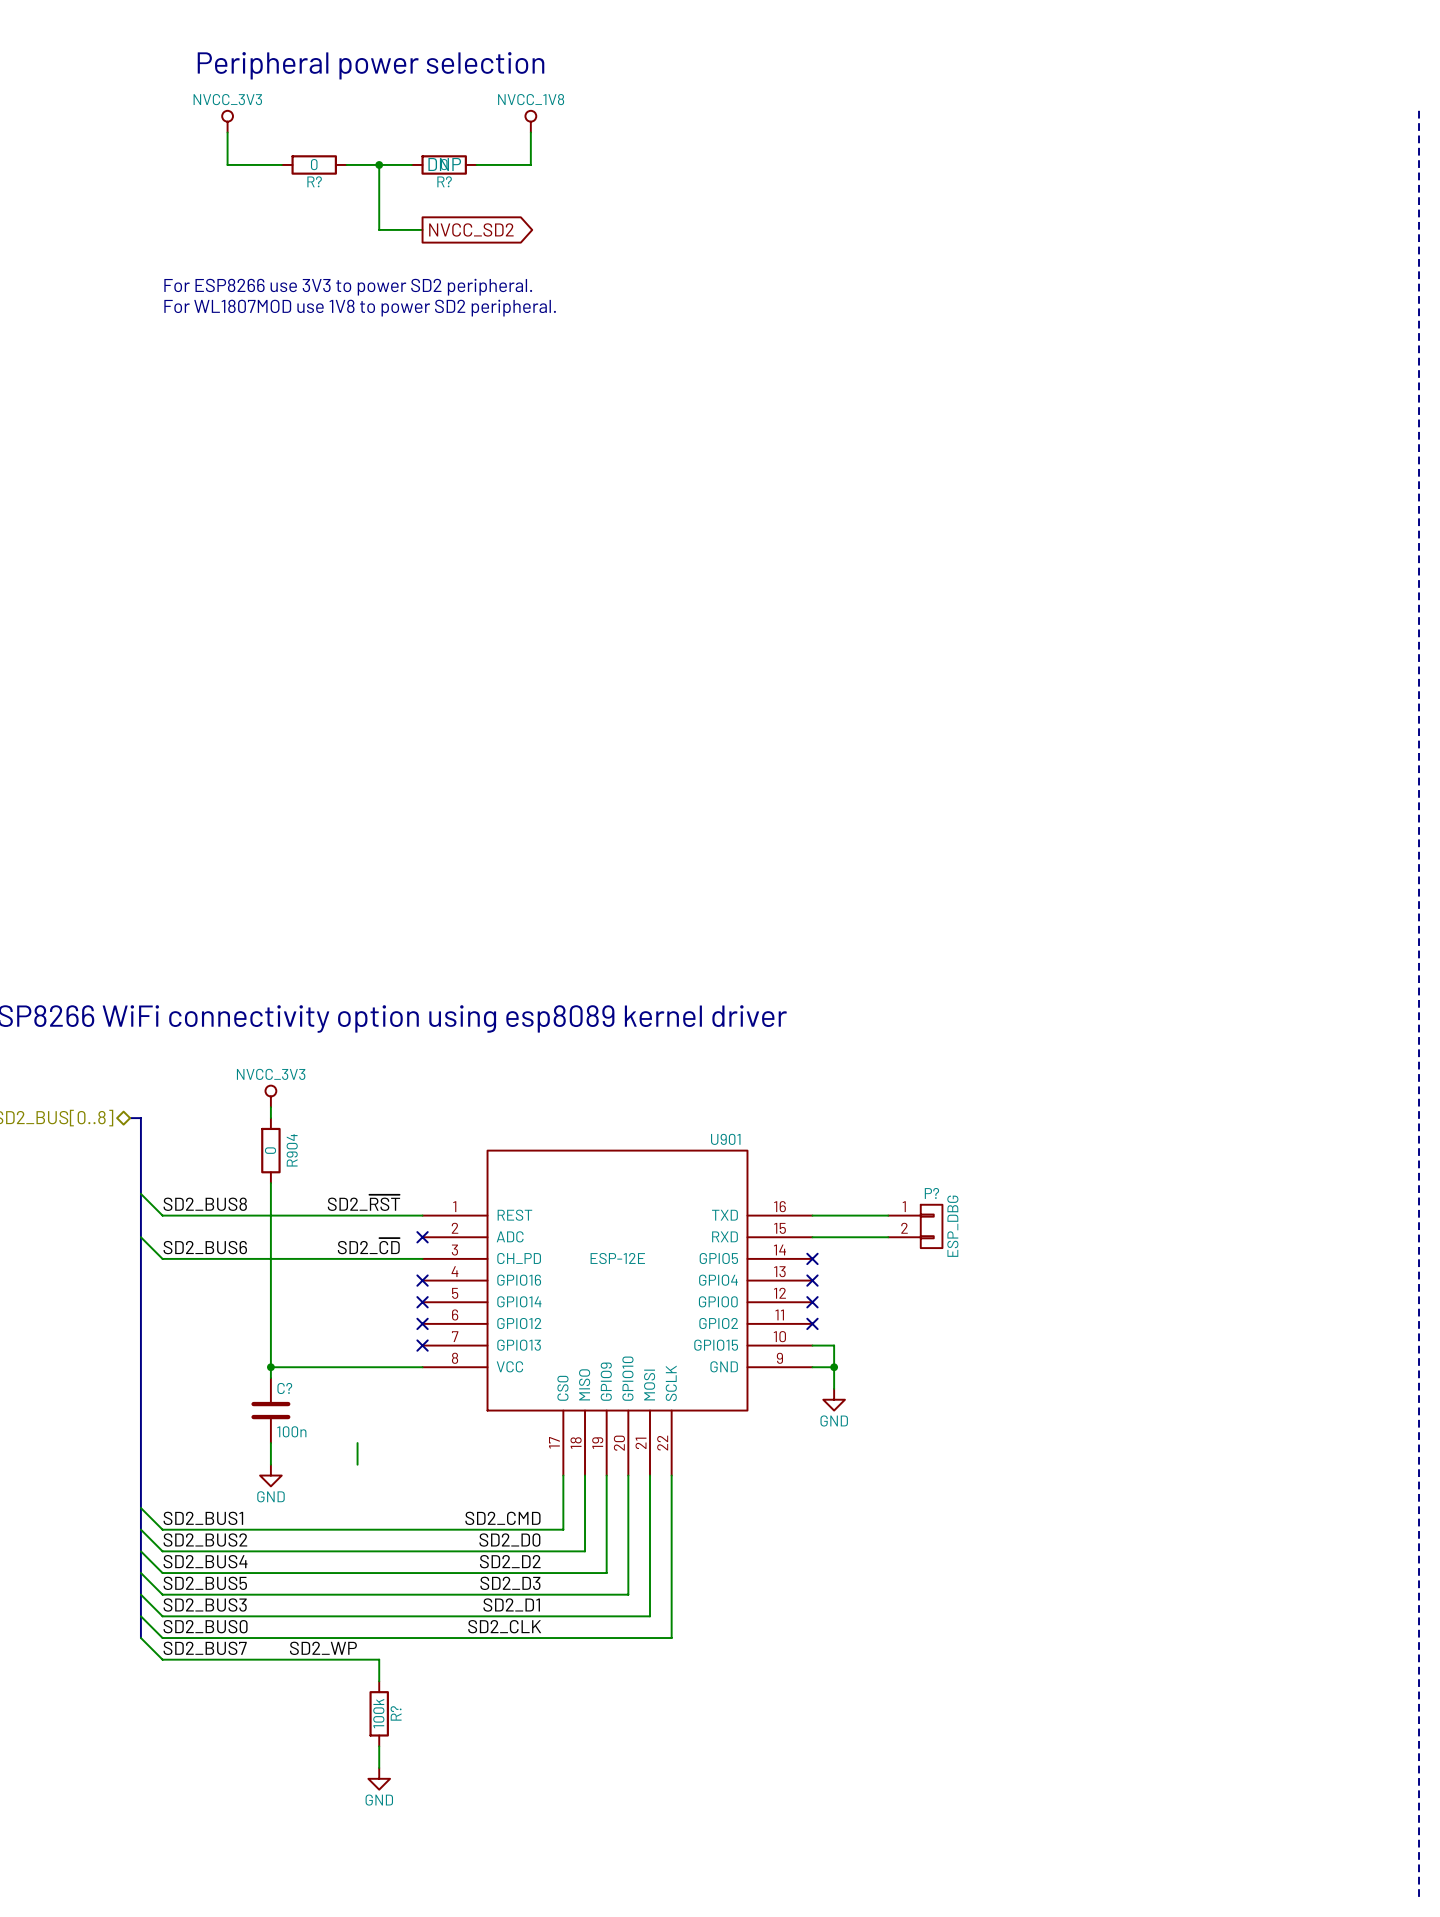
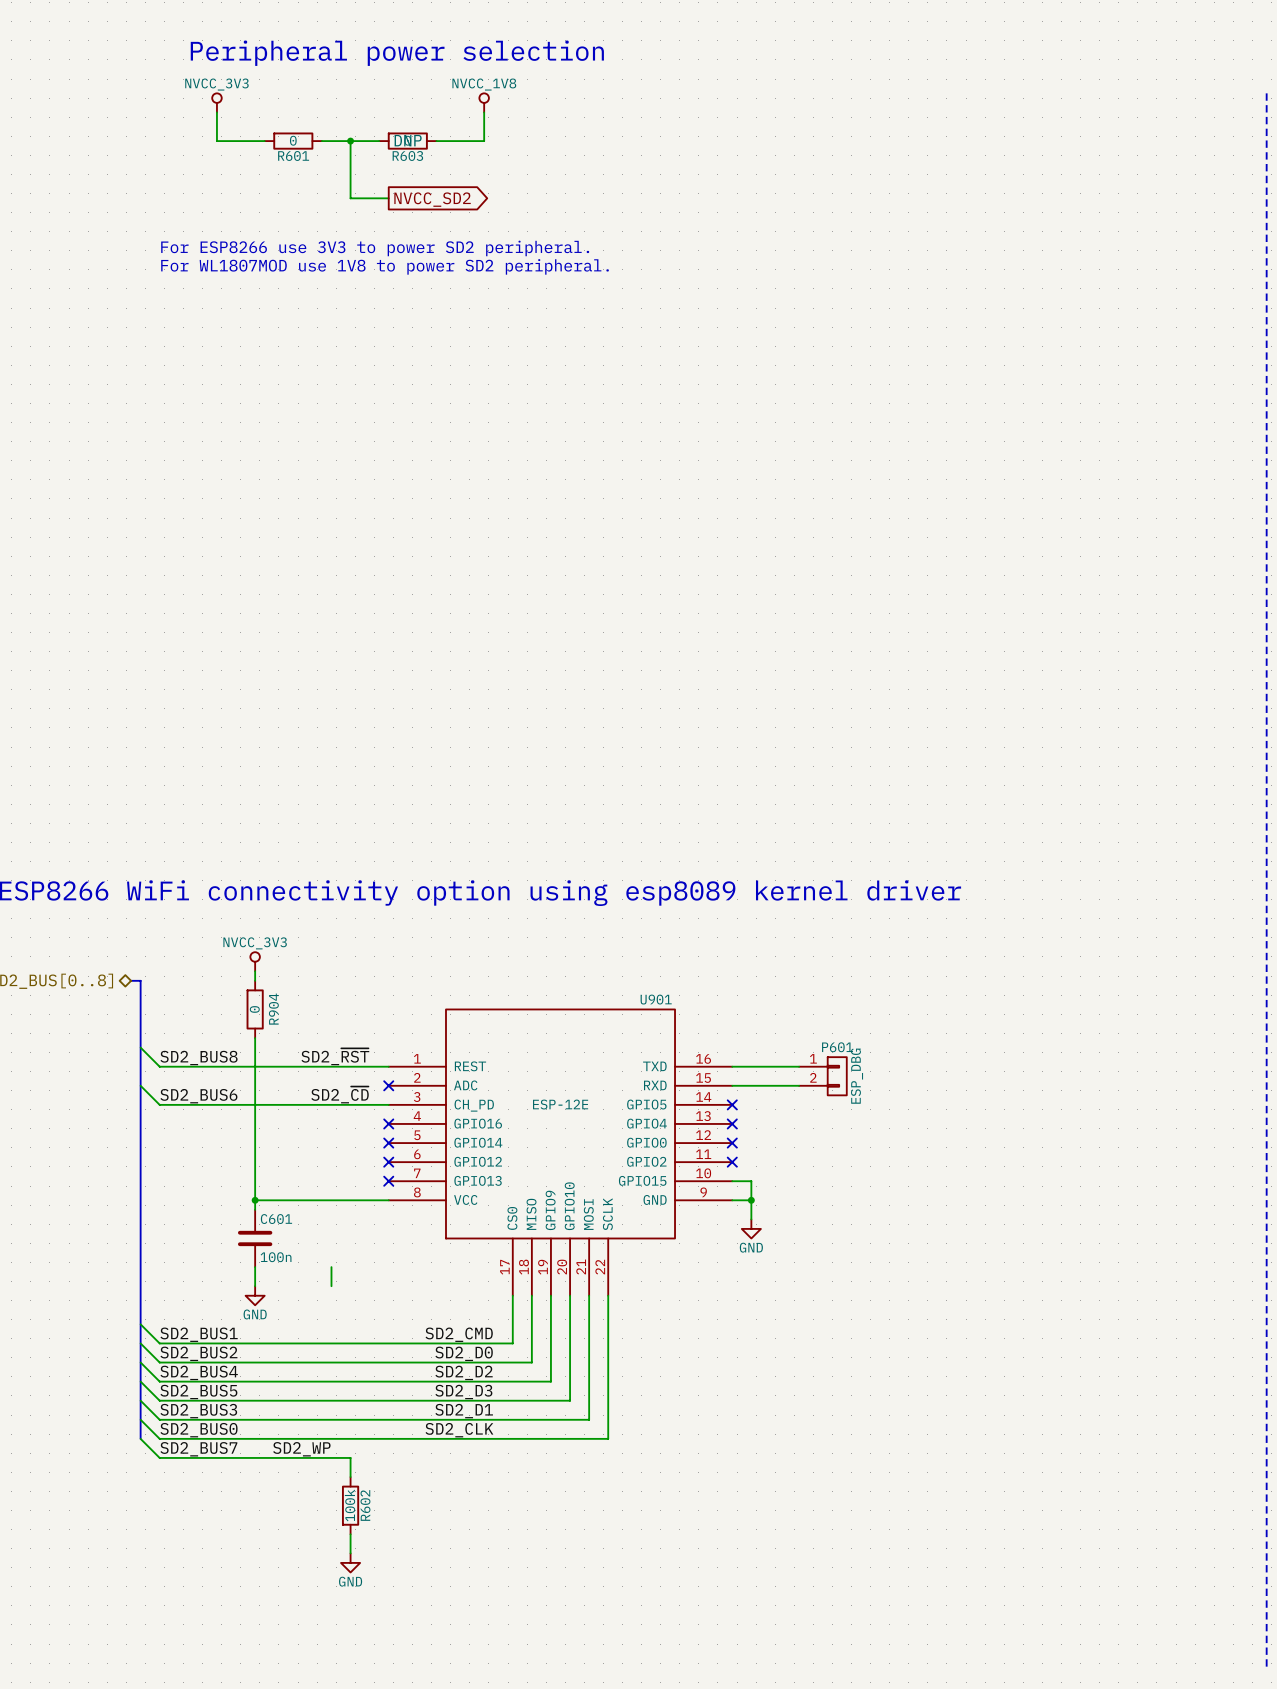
R? name: R? (314, 181) -> R601 (293, 155)
R? name: R? (444, 181) -> R603 (407, 155)
P? name: P? (931, 1193) -> P601 (837, 1047)
C? name: C? (284, 1388) -> C601 (276, 1219)
R? name: R? (396, 1713) -> R602 (365, 1505)

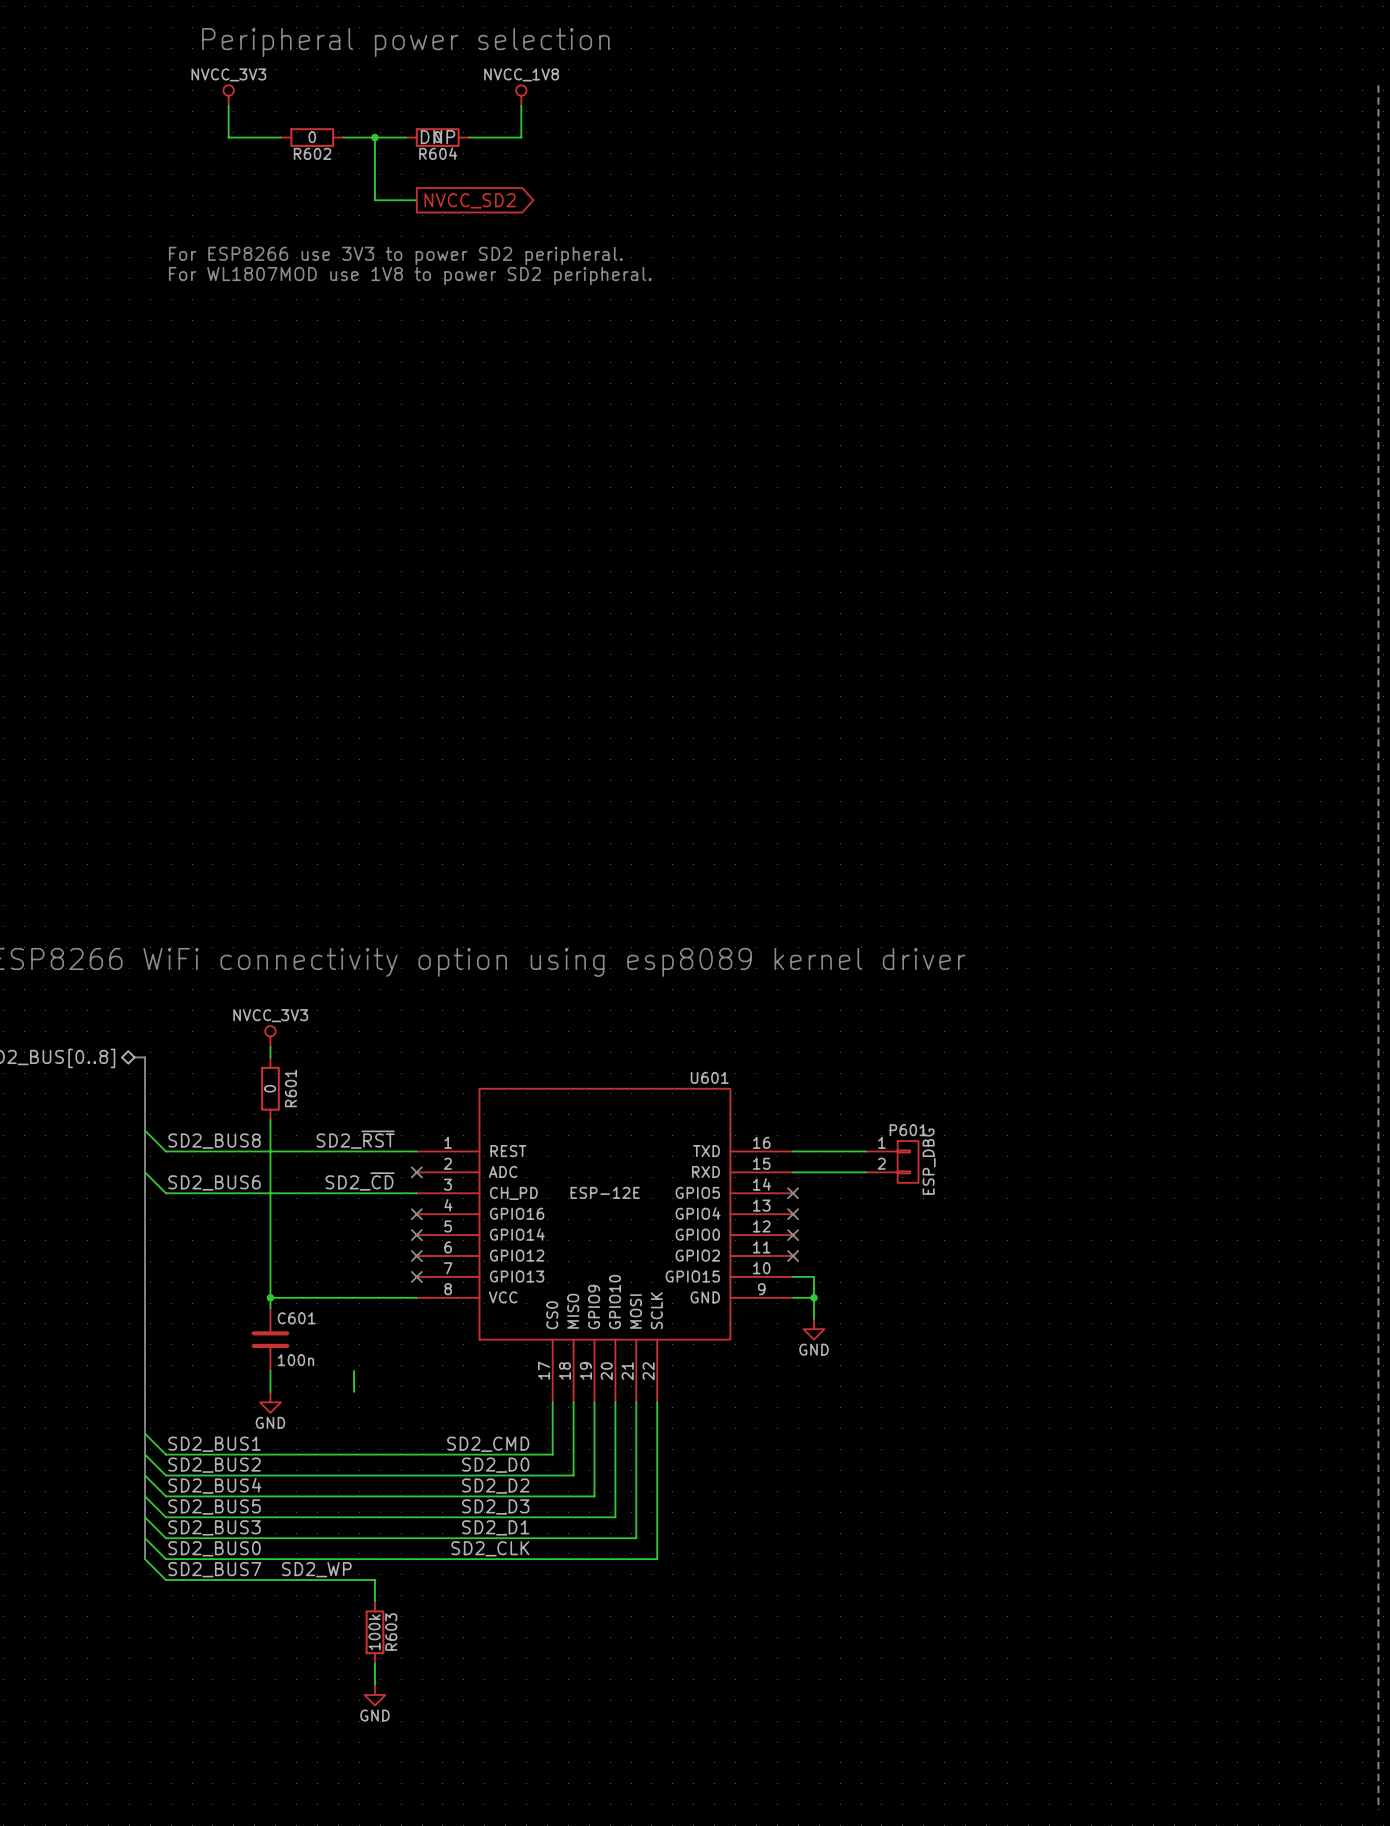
R601 name: R601 (293, 155) -> R602 (312, 153)
R603 name: R603 (407, 155) -> R604 (438, 153)
U901 name: U901 (656, 999) -> U601 (709, 1077)
R904 name: R904 (273, 1009) -> R601 (290, 1088)
R602 name: R602 (365, 1505) -> R603 (391, 1632)

